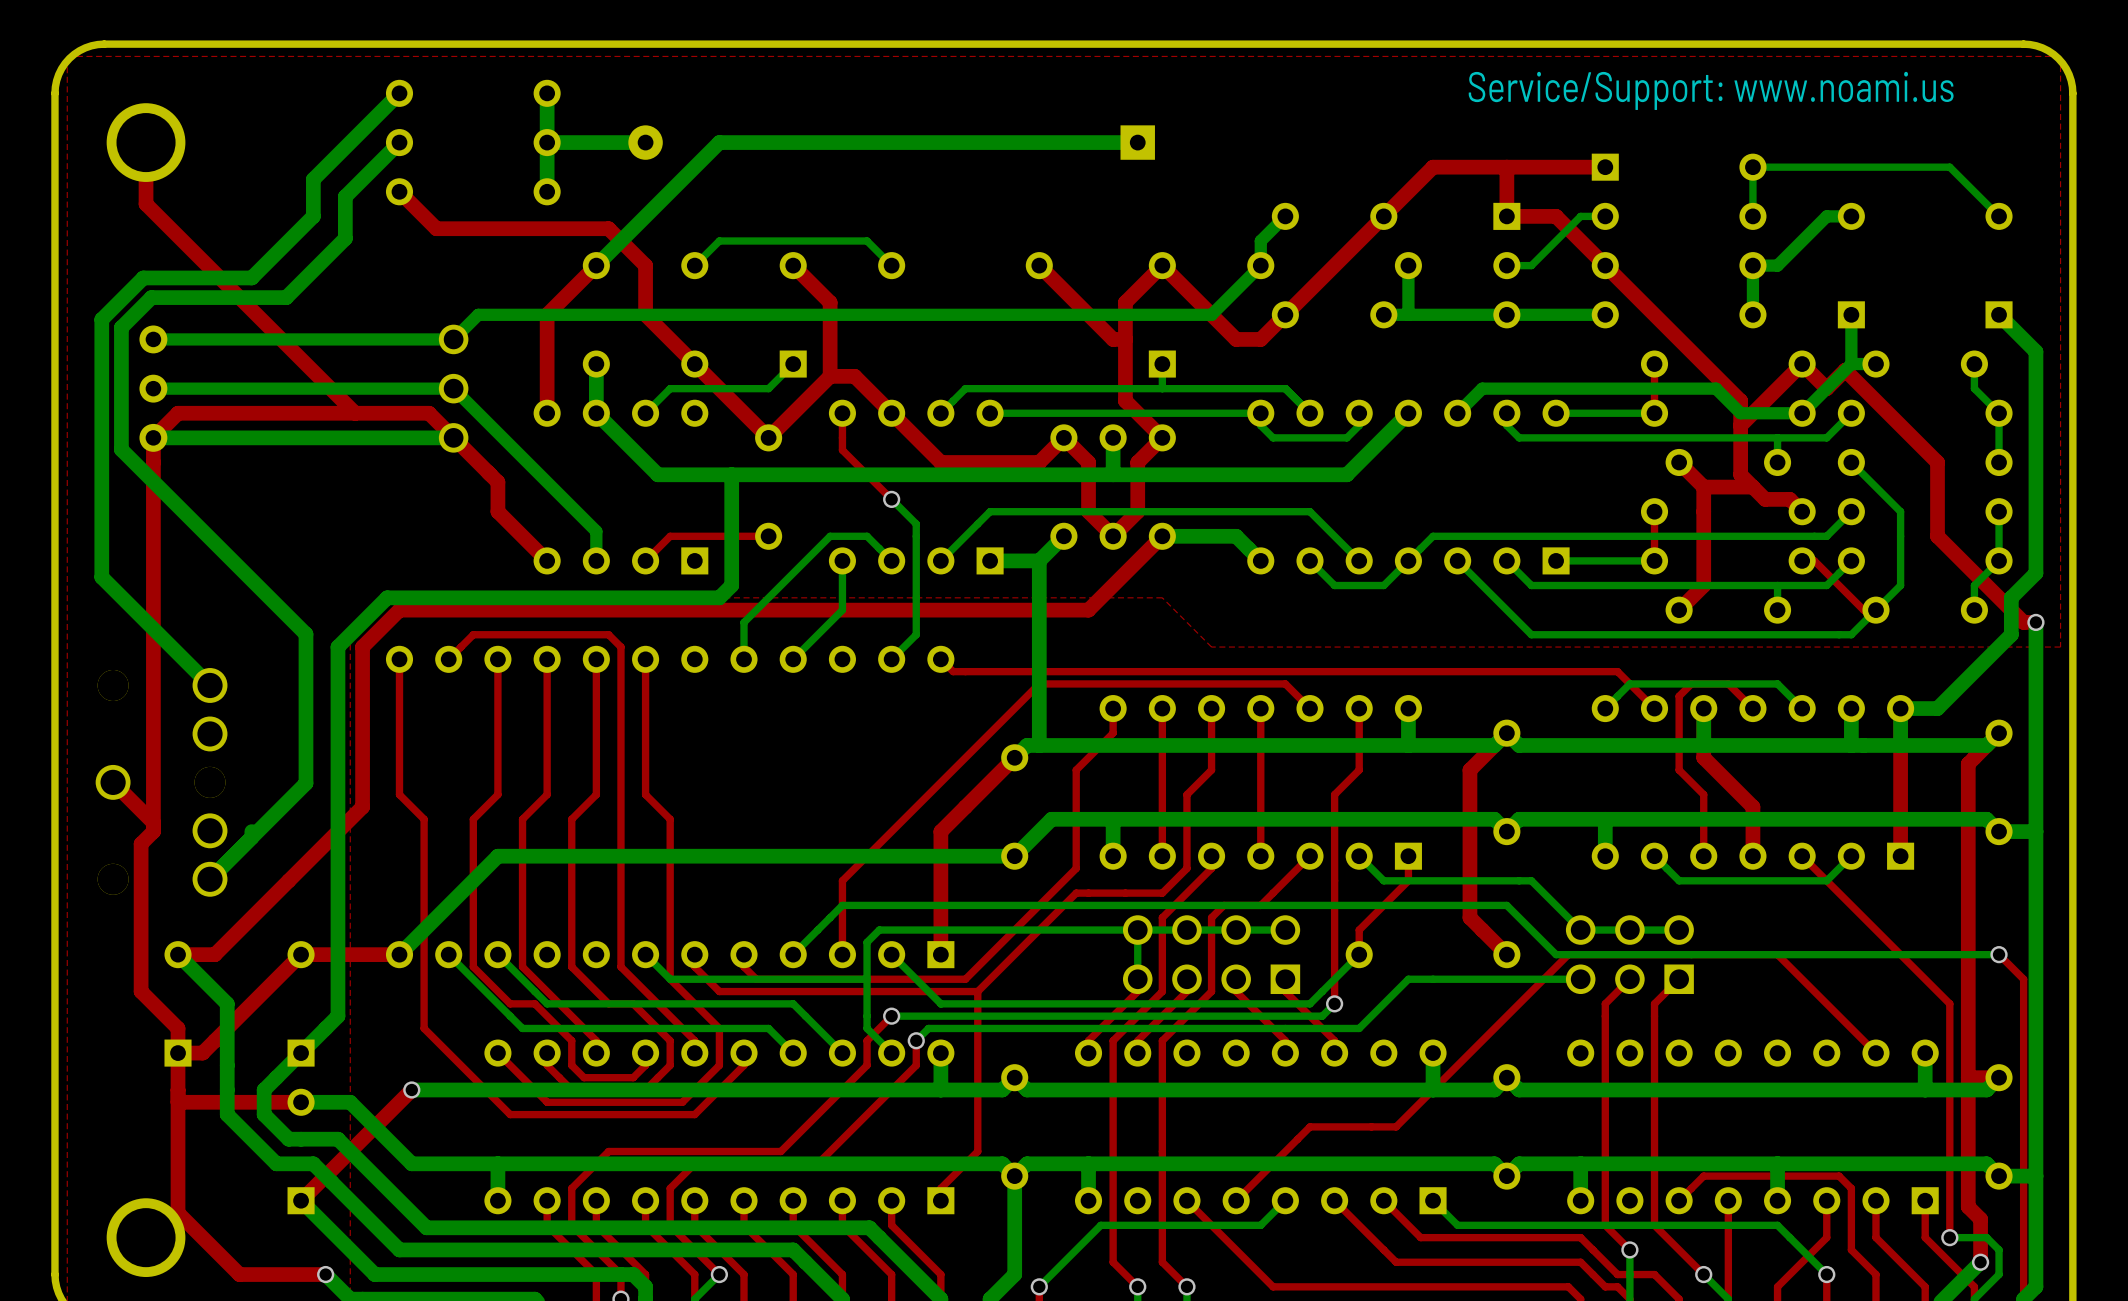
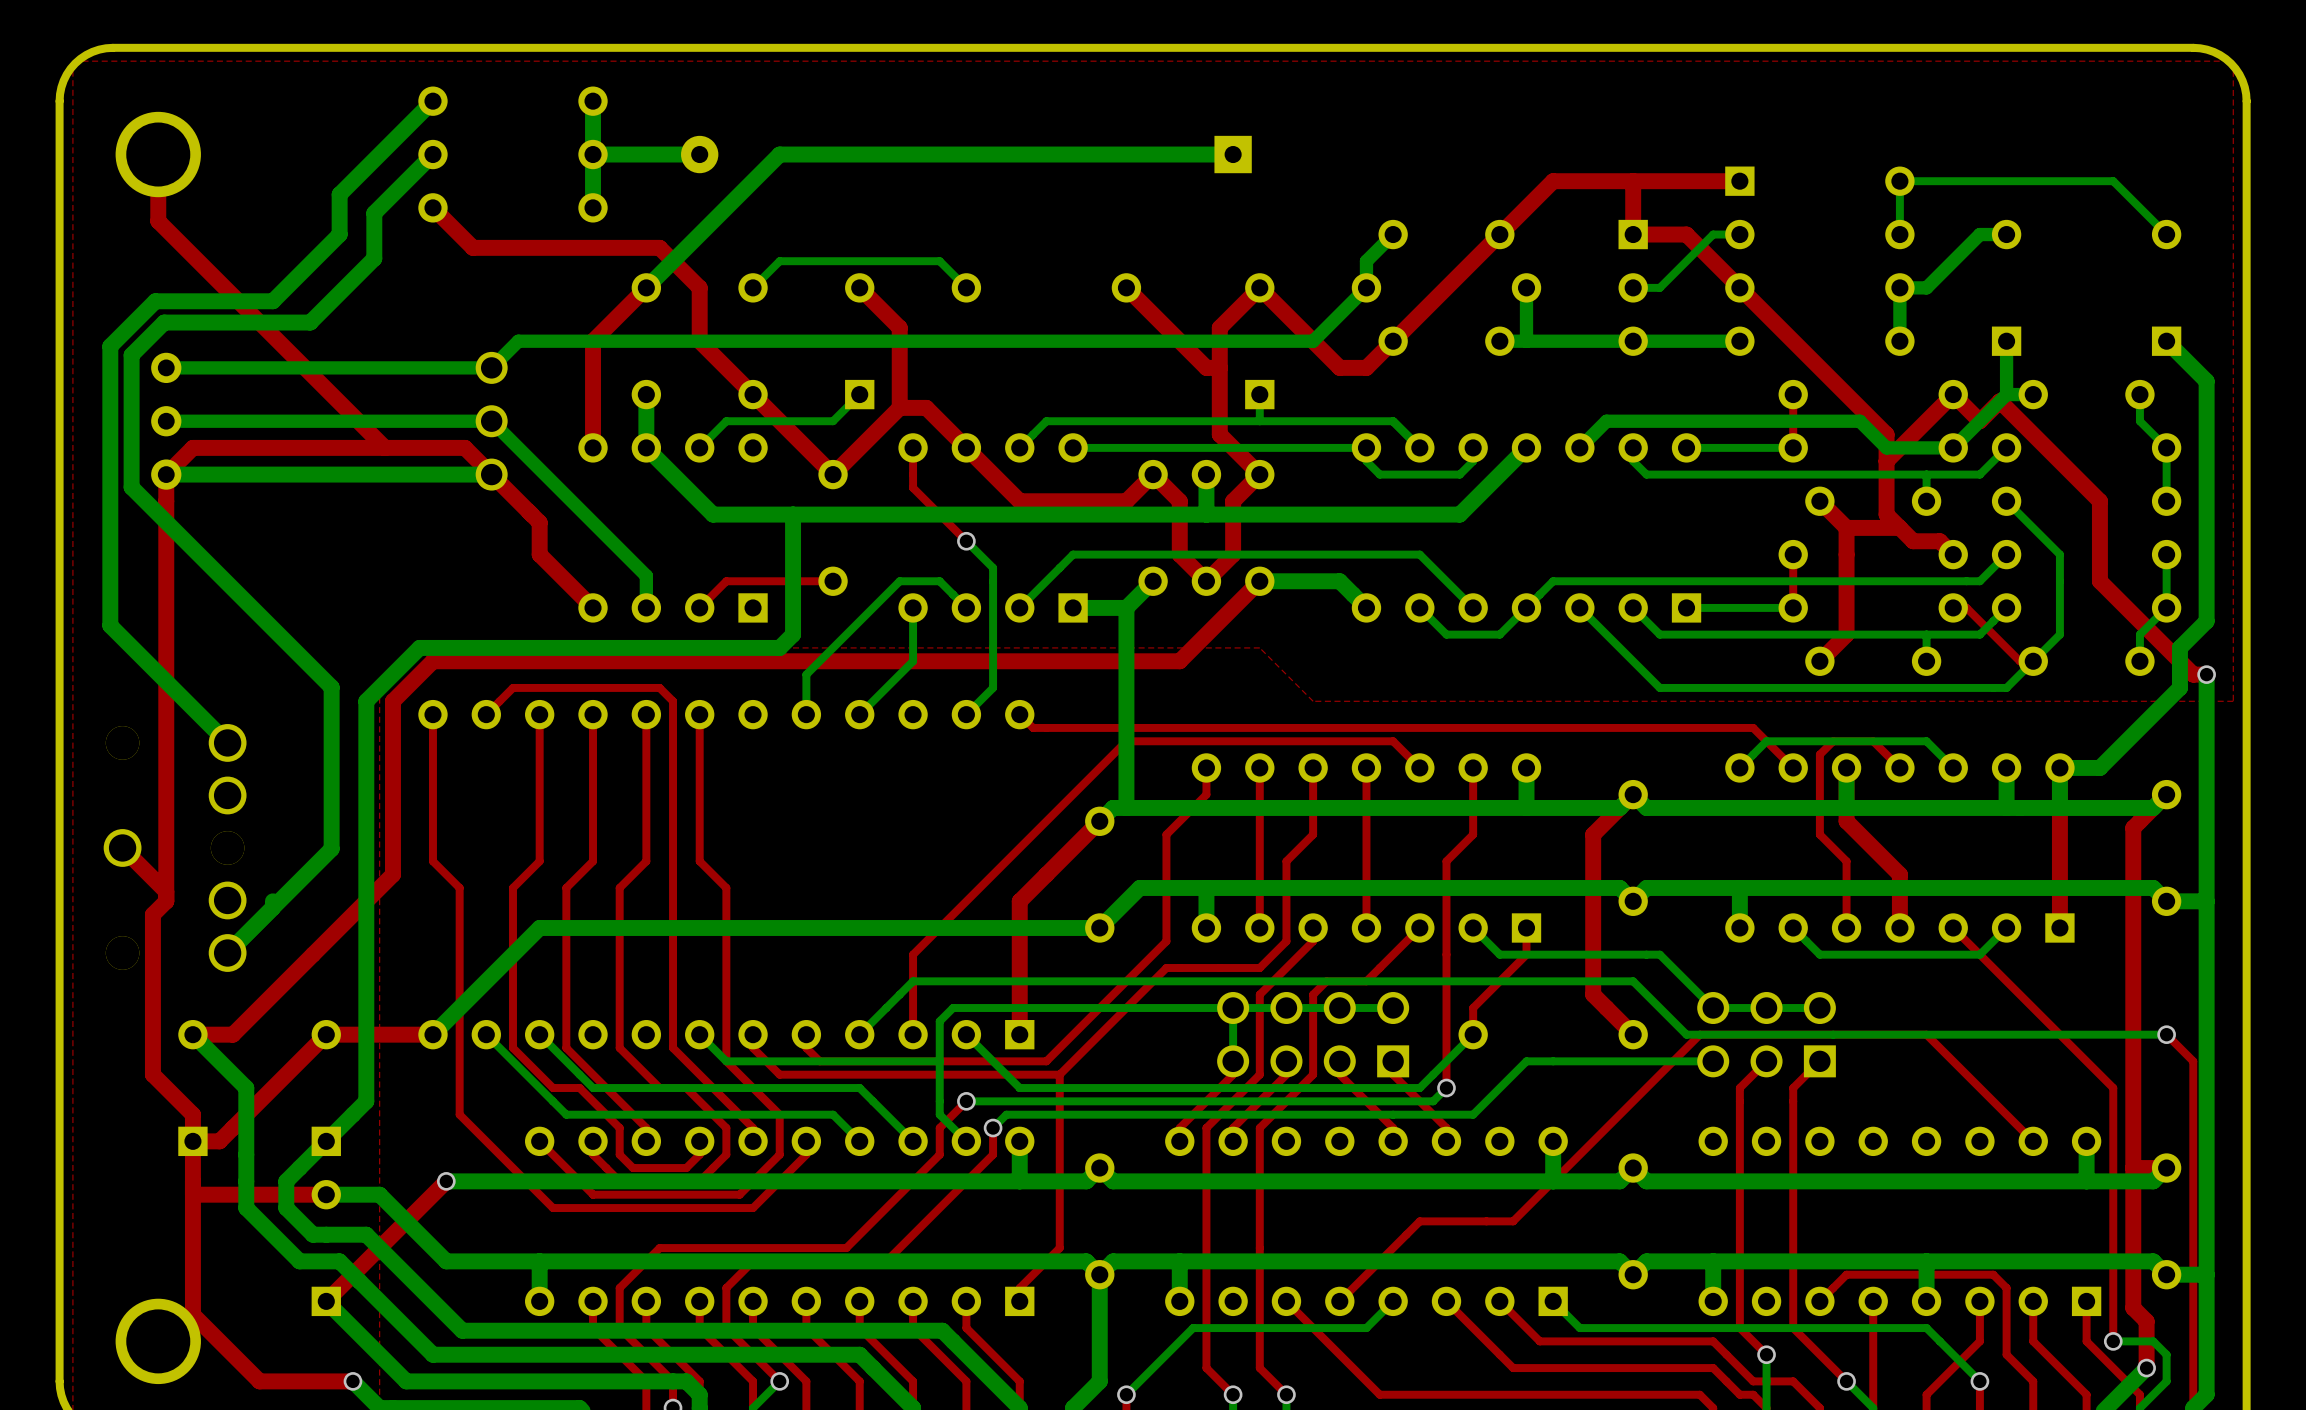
text: Service/Support: www.noami.us (1711, 90) -> none

